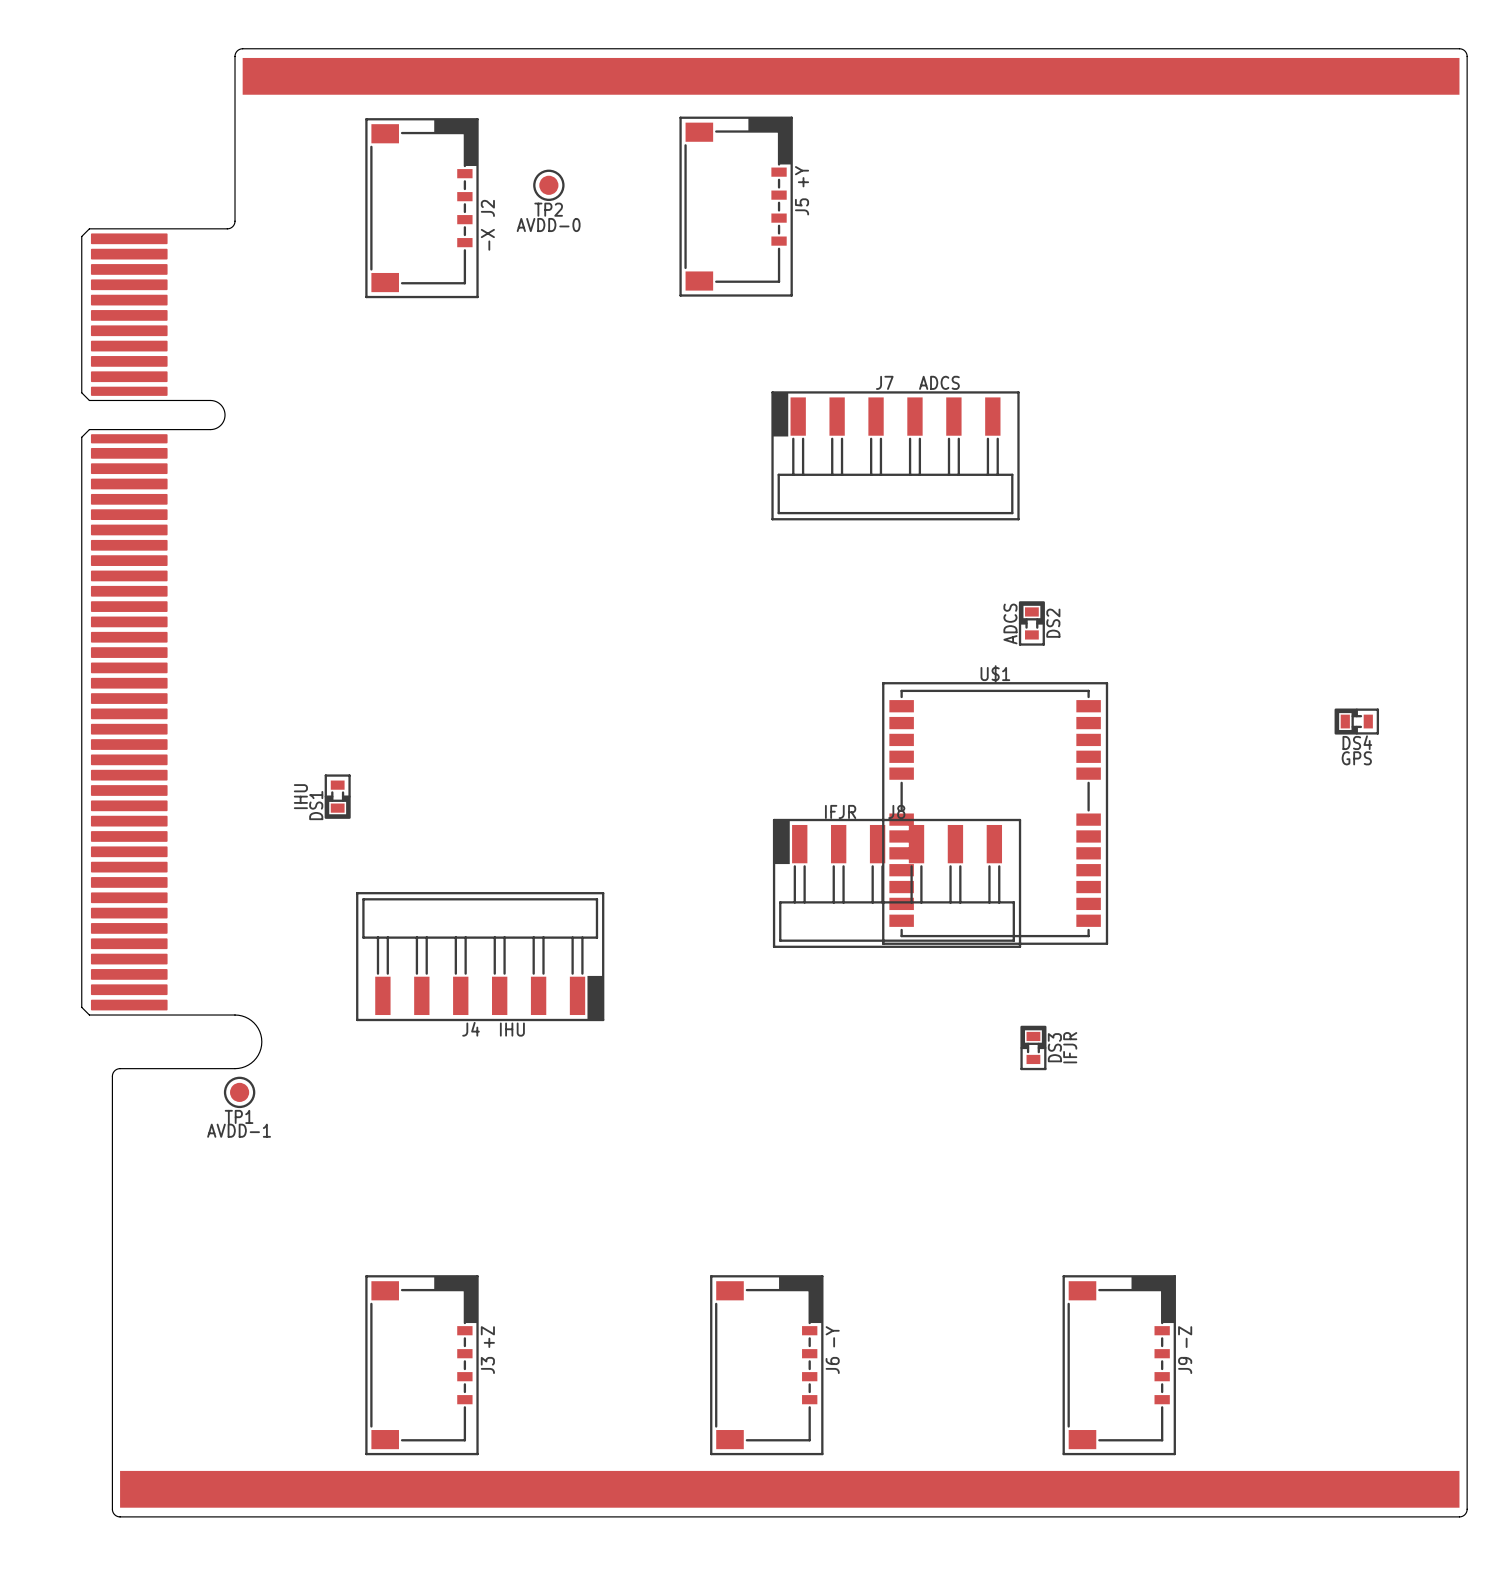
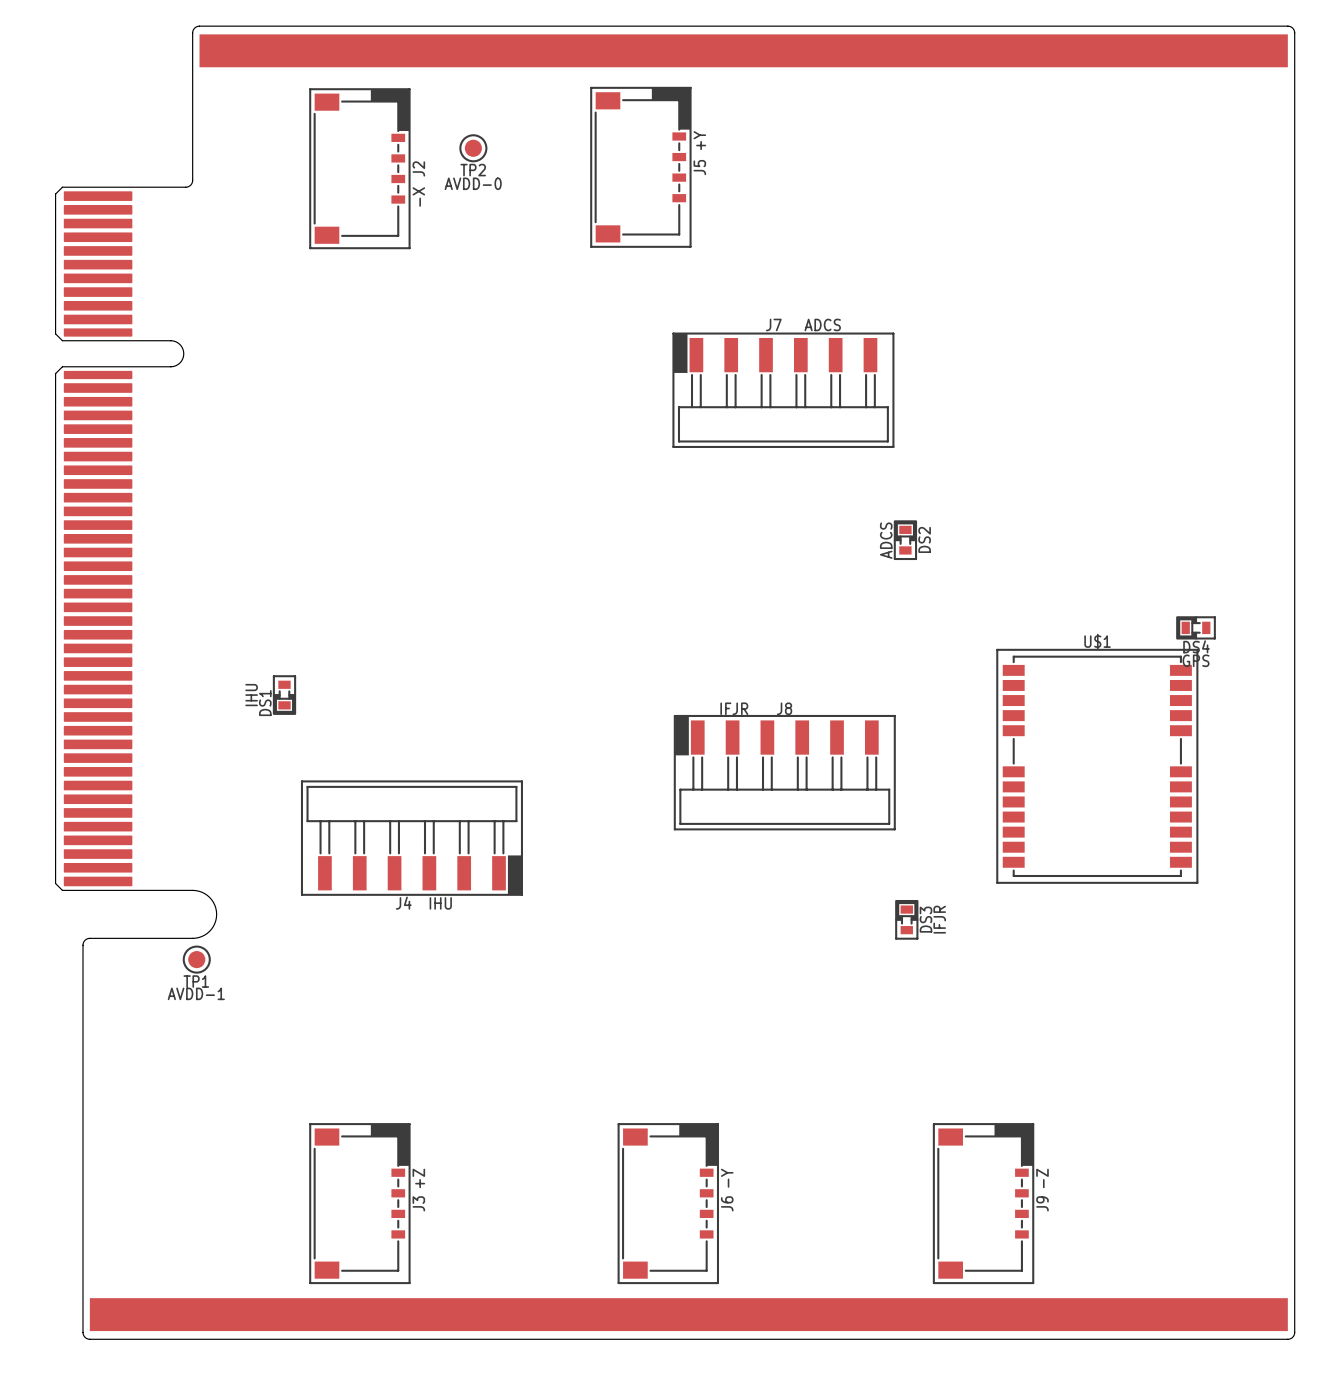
U$1 position: (995, 813) -> (1097, 766)

